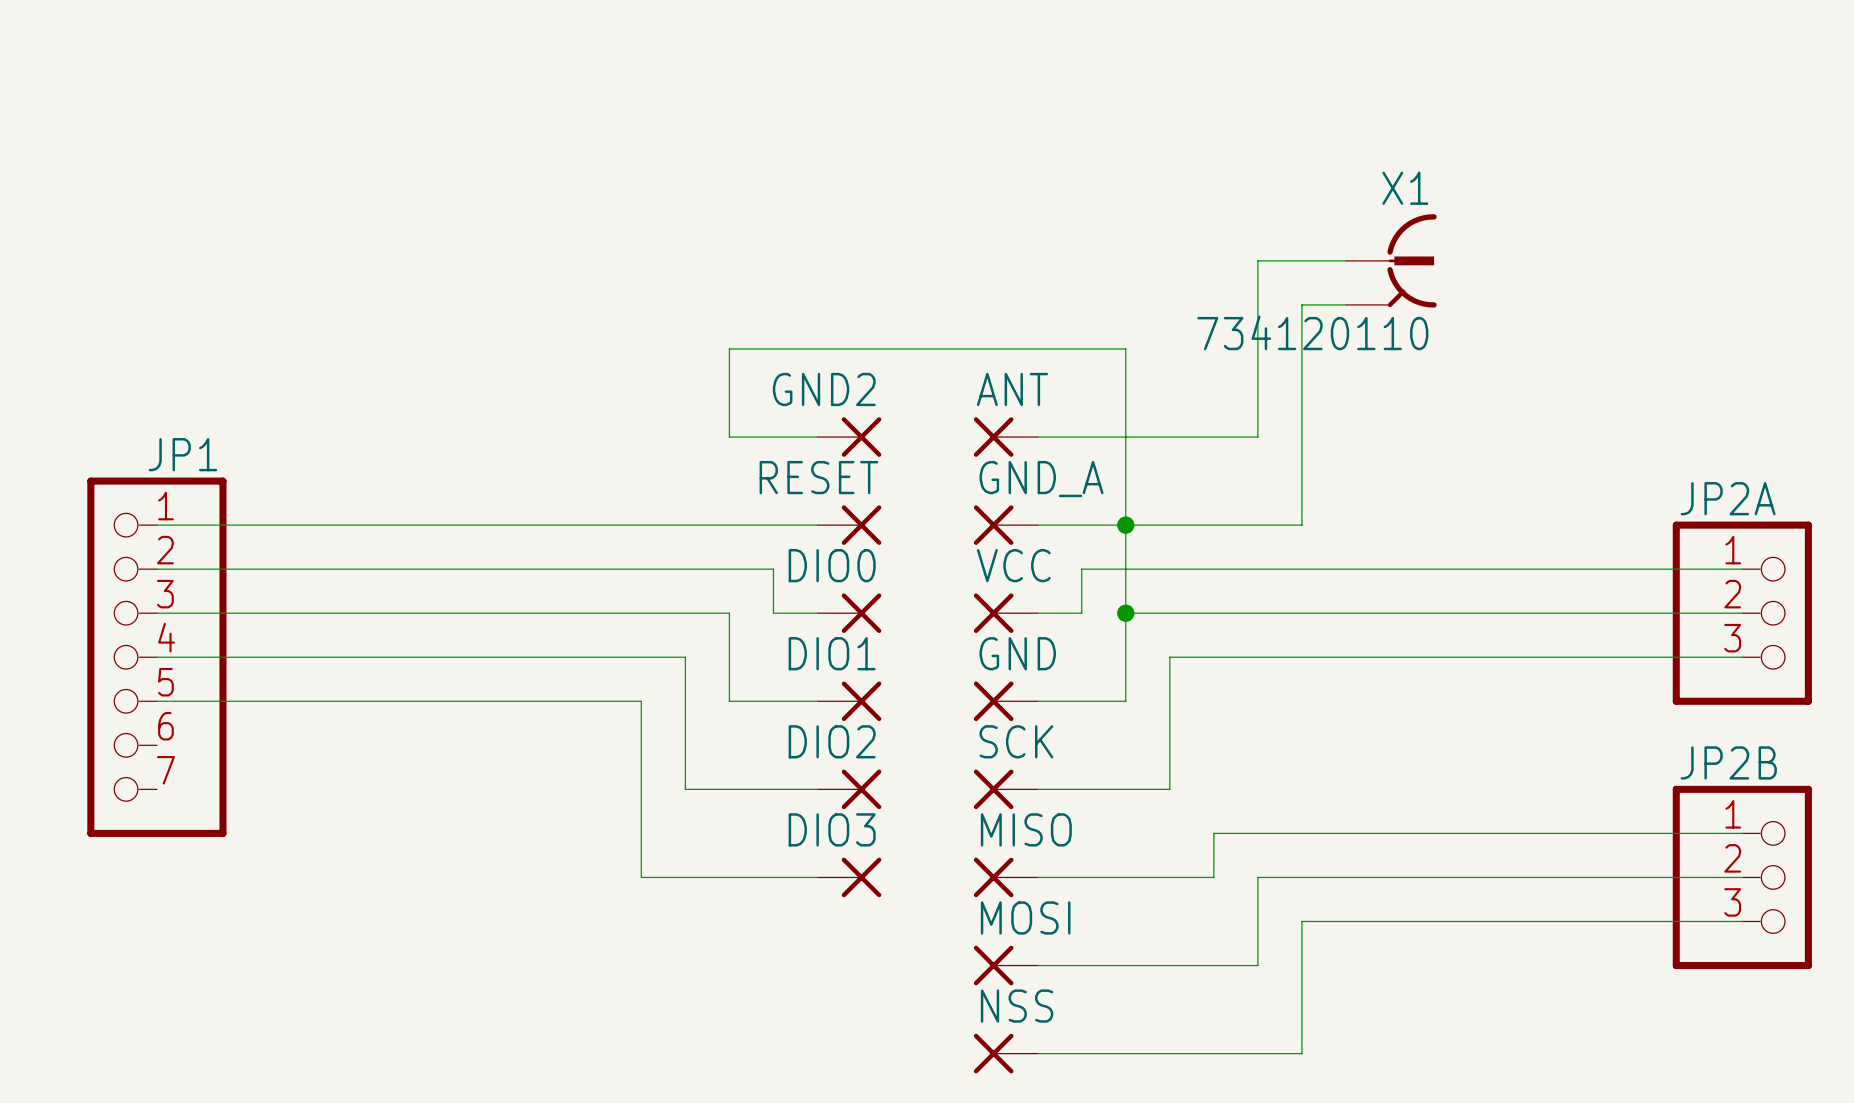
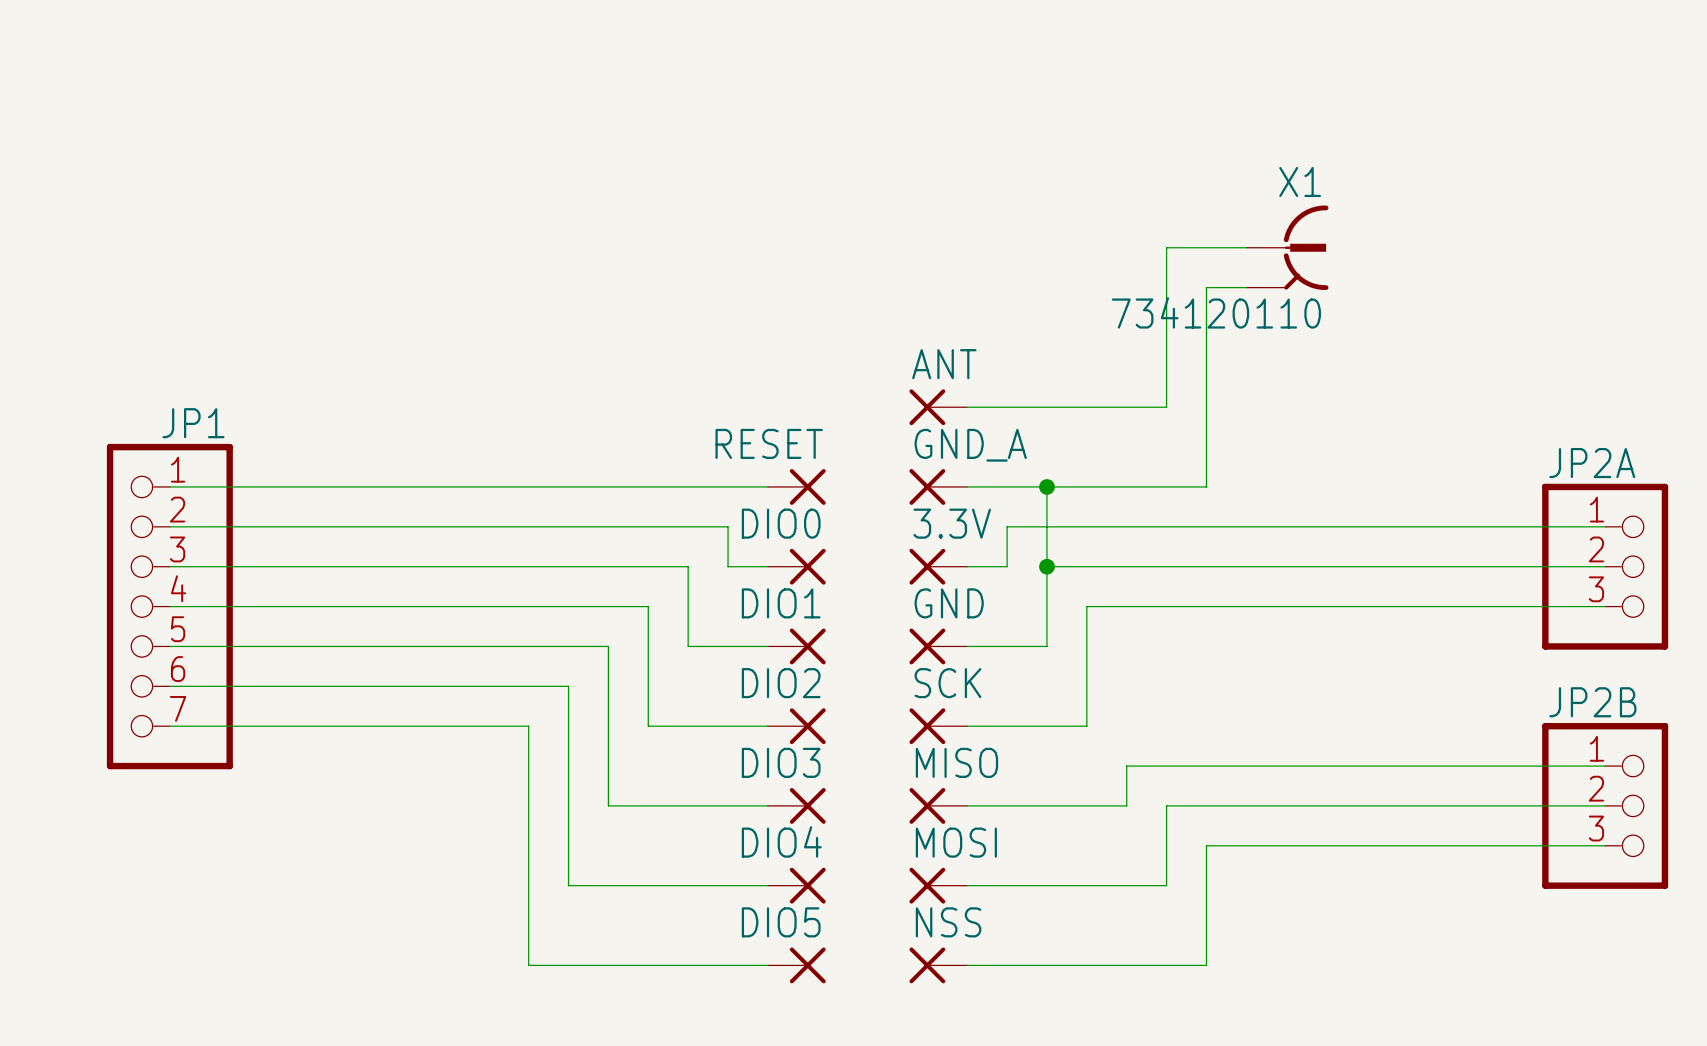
wire: (817, 437) (729, 437) (729, 348) (1125, 348) (1125, 525) -> none
GND2: (849, 437) -> none
VCC name: VCC (1013, 565) -> 3.3V (952, 523)
wire: none -> (169, 686) (568, 686) (568, 885) (767, 885)
wire: none -> (169, 726) (528, 726) (528, 965) (767, 965)
DIO4: none -> (796, 885)
DIO5: none -> (796, 965)

